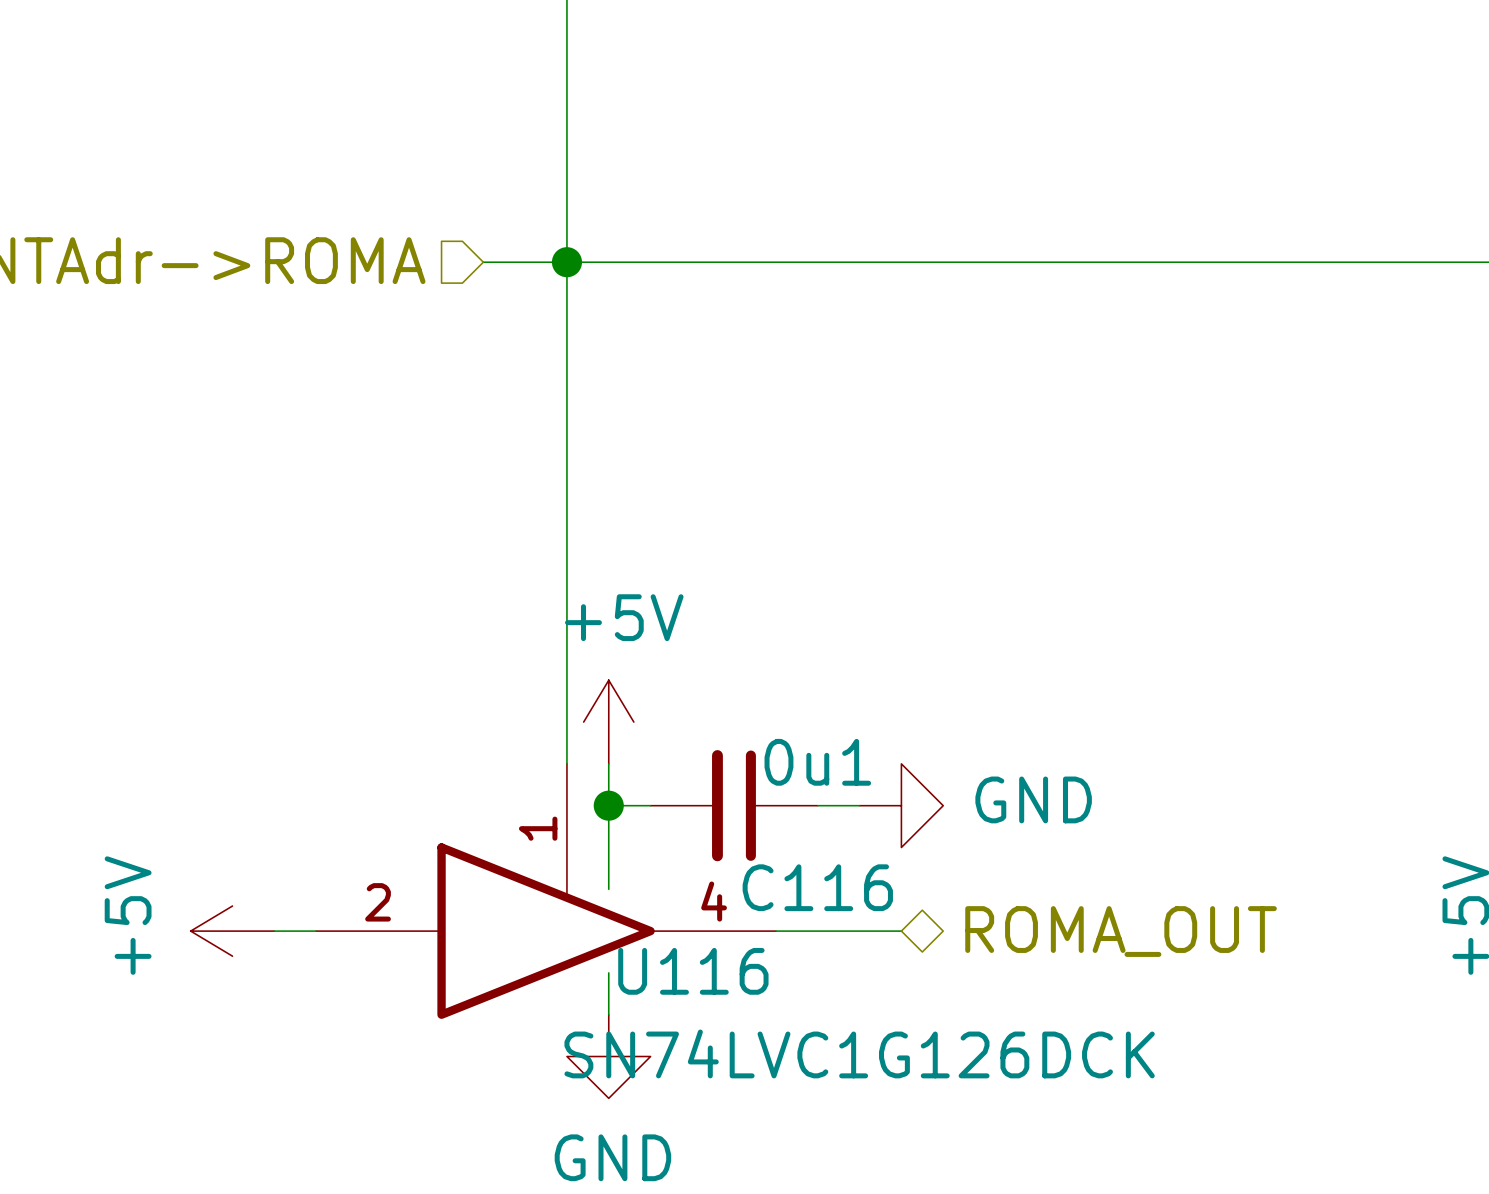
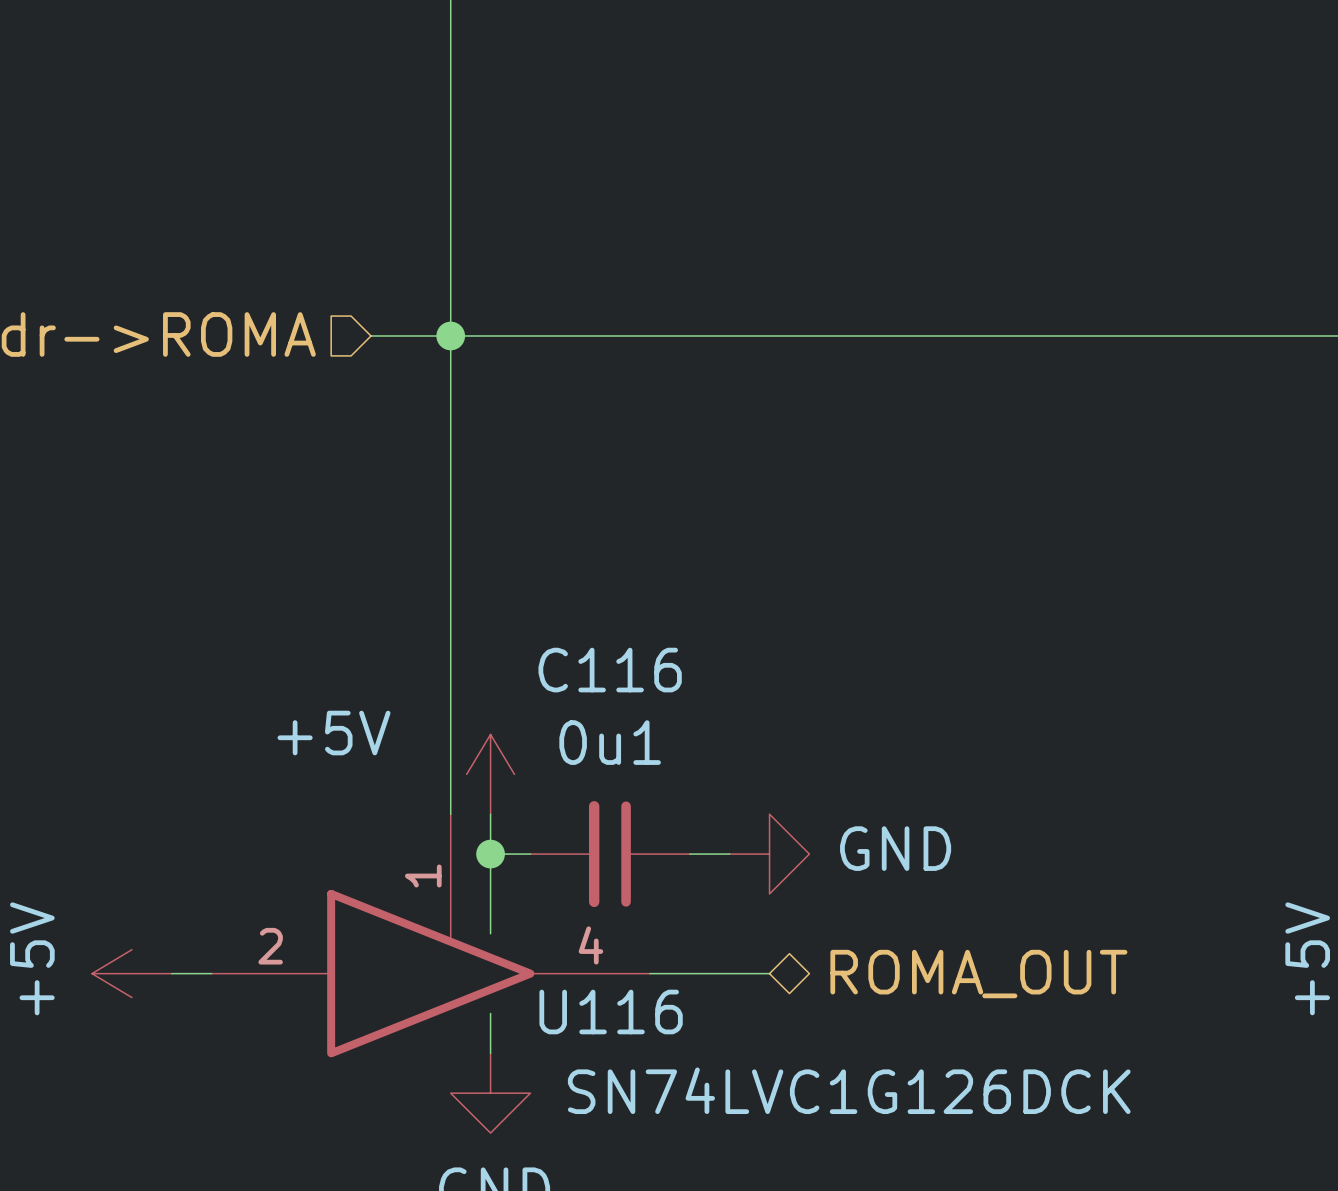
power symbol text position: +5V (624, 617) -> +5V (334, 733)
C116 value position: 0u1 (817, 762) -> 0u1 (610, 742)
C116 name position: C116 (817, 887) -> C116 (610, 670)
U116 name position: U116 (693, 971) -> U116 (611, 1011)
U116 value position: SN74LVC1G126DCK (859, 1053) -> SN74LVC1G126DCK (849, 1090)

